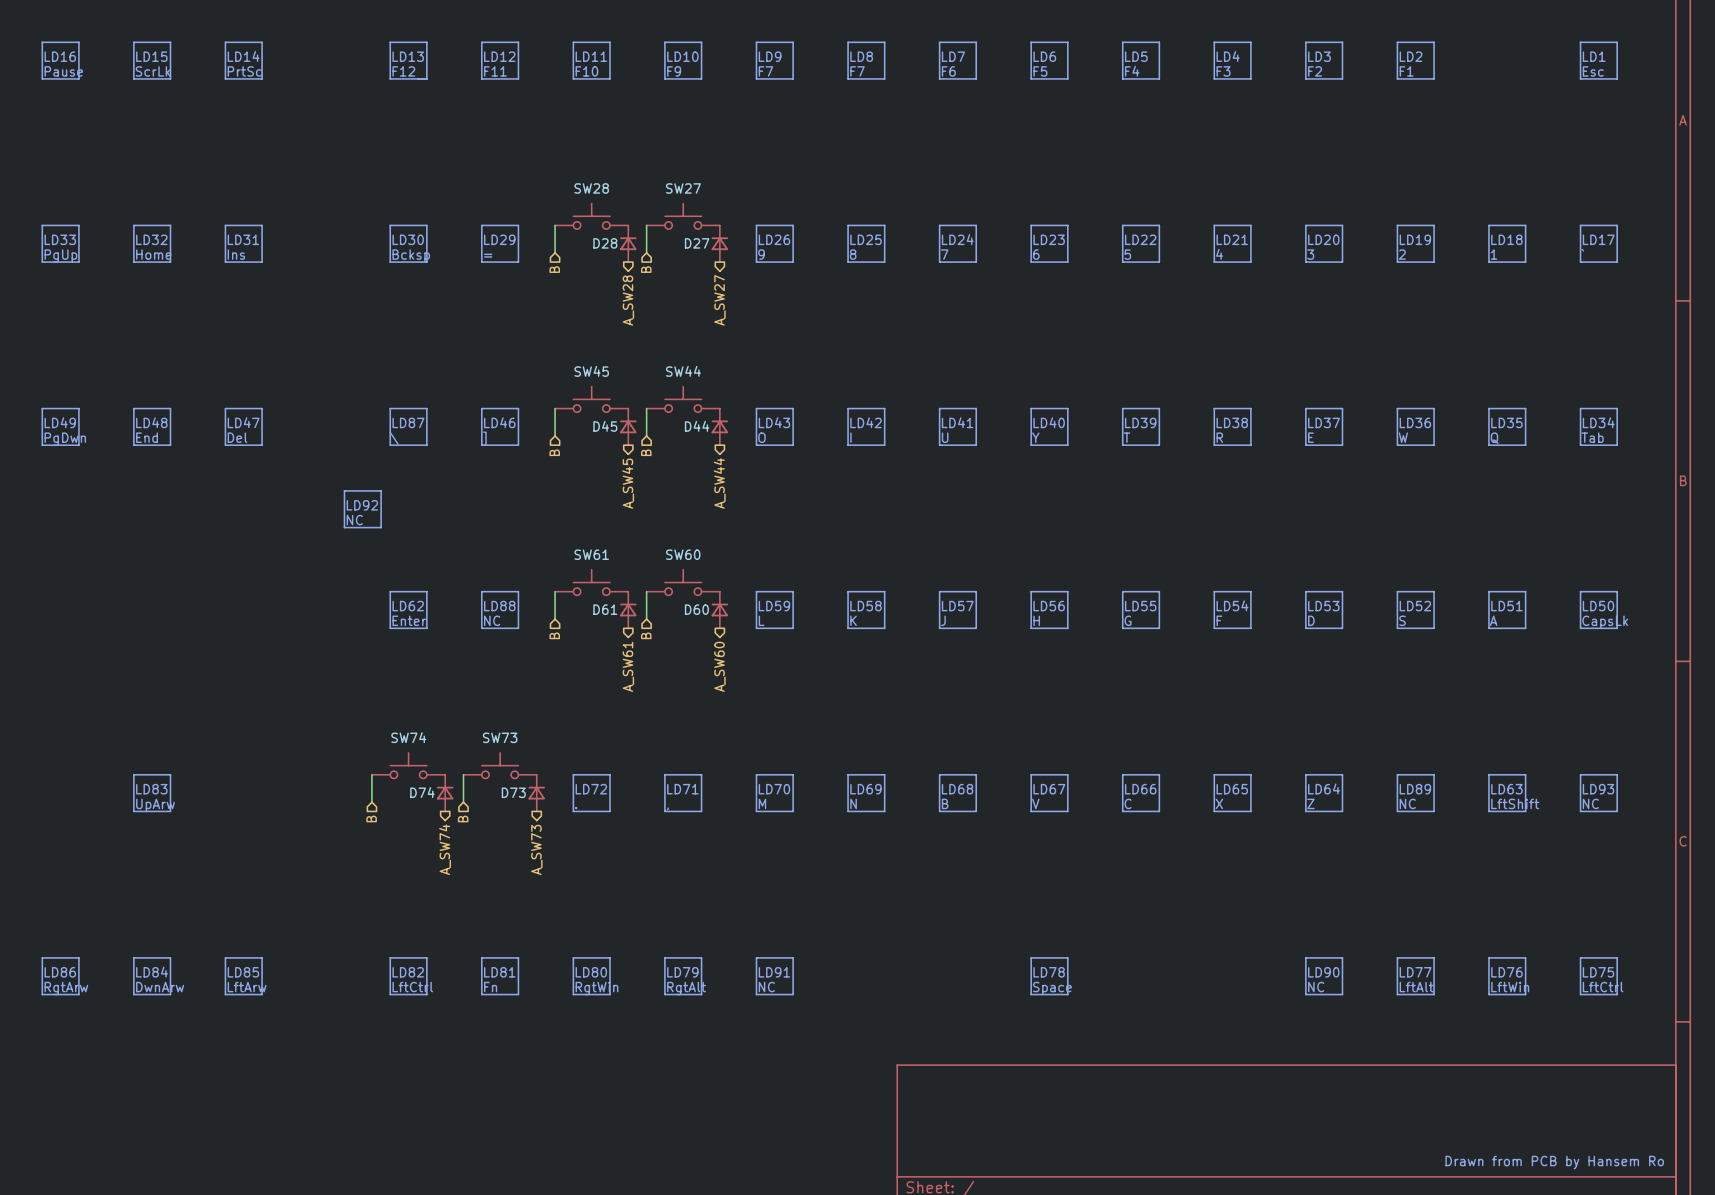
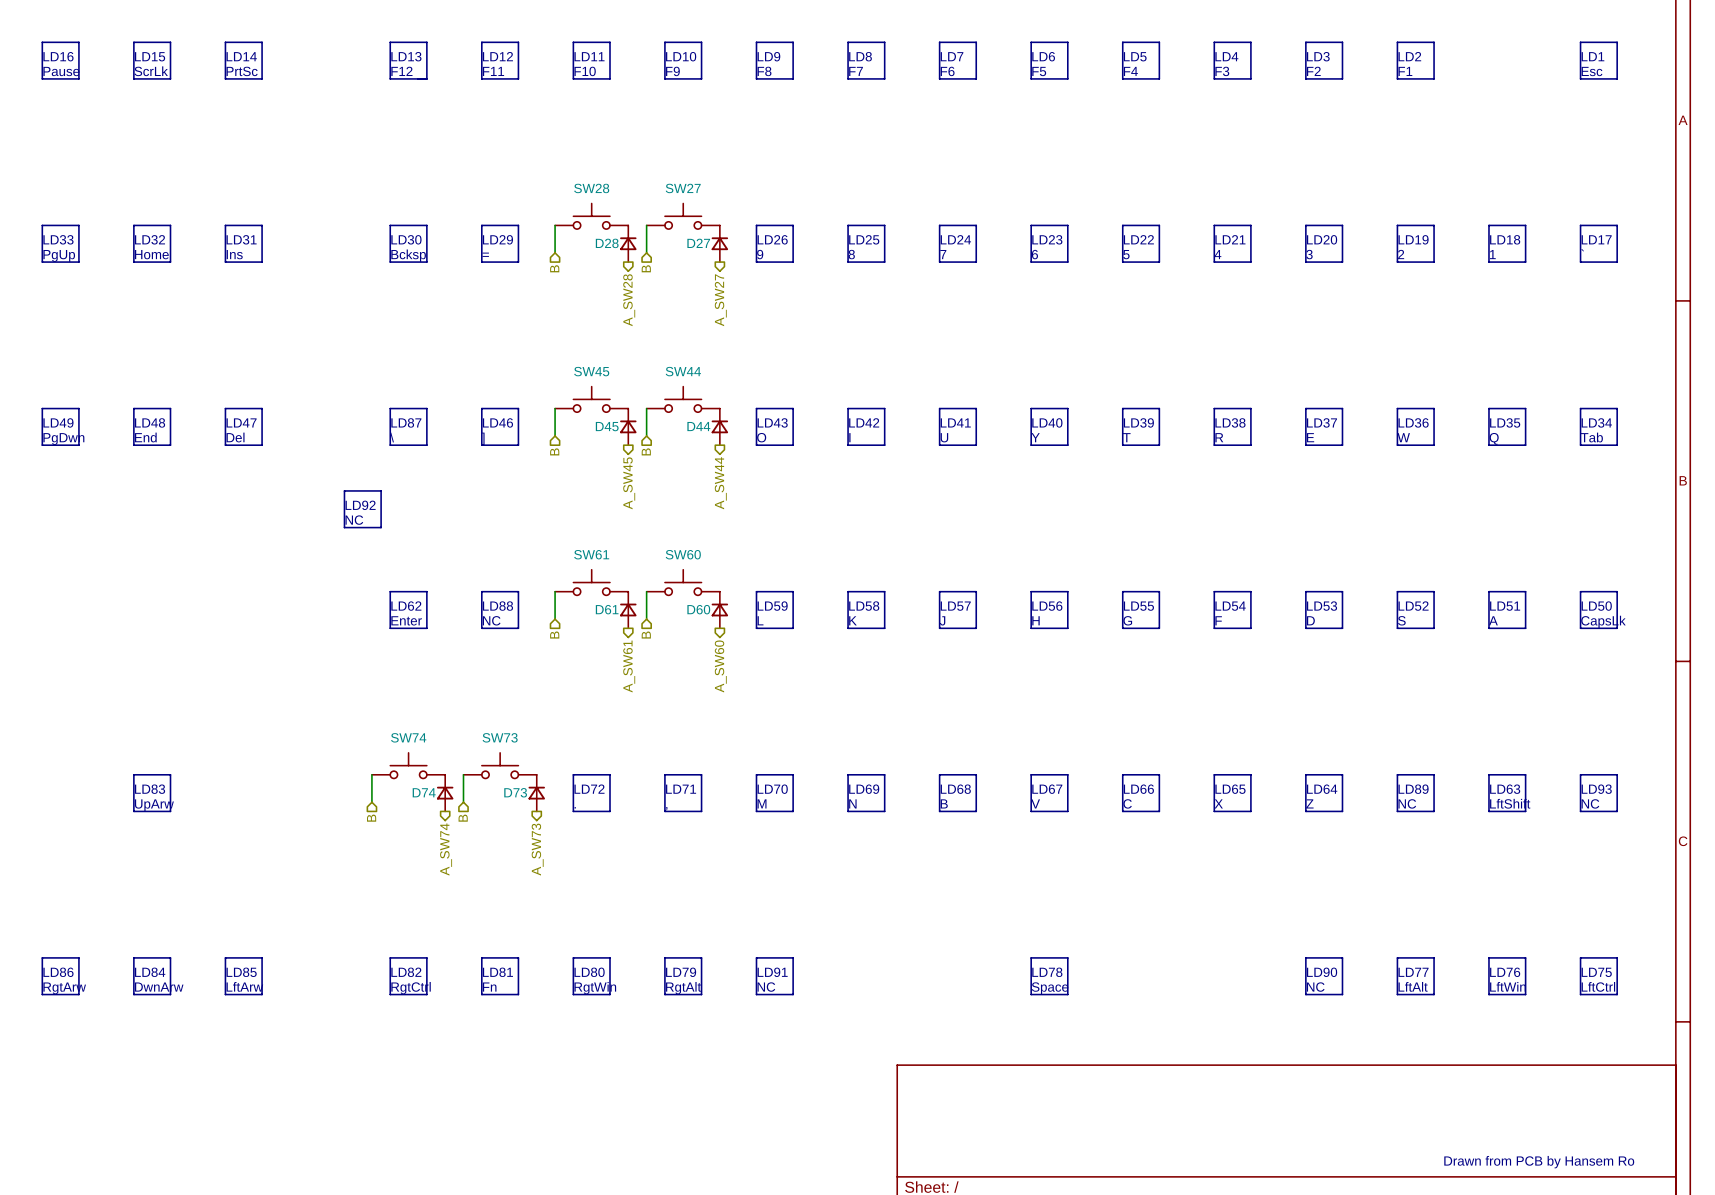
text: F7 (765, 71) -> F8 (764, 71)
text: LftCtrl (412, 987) -> RgtCtrl (411, 988)

